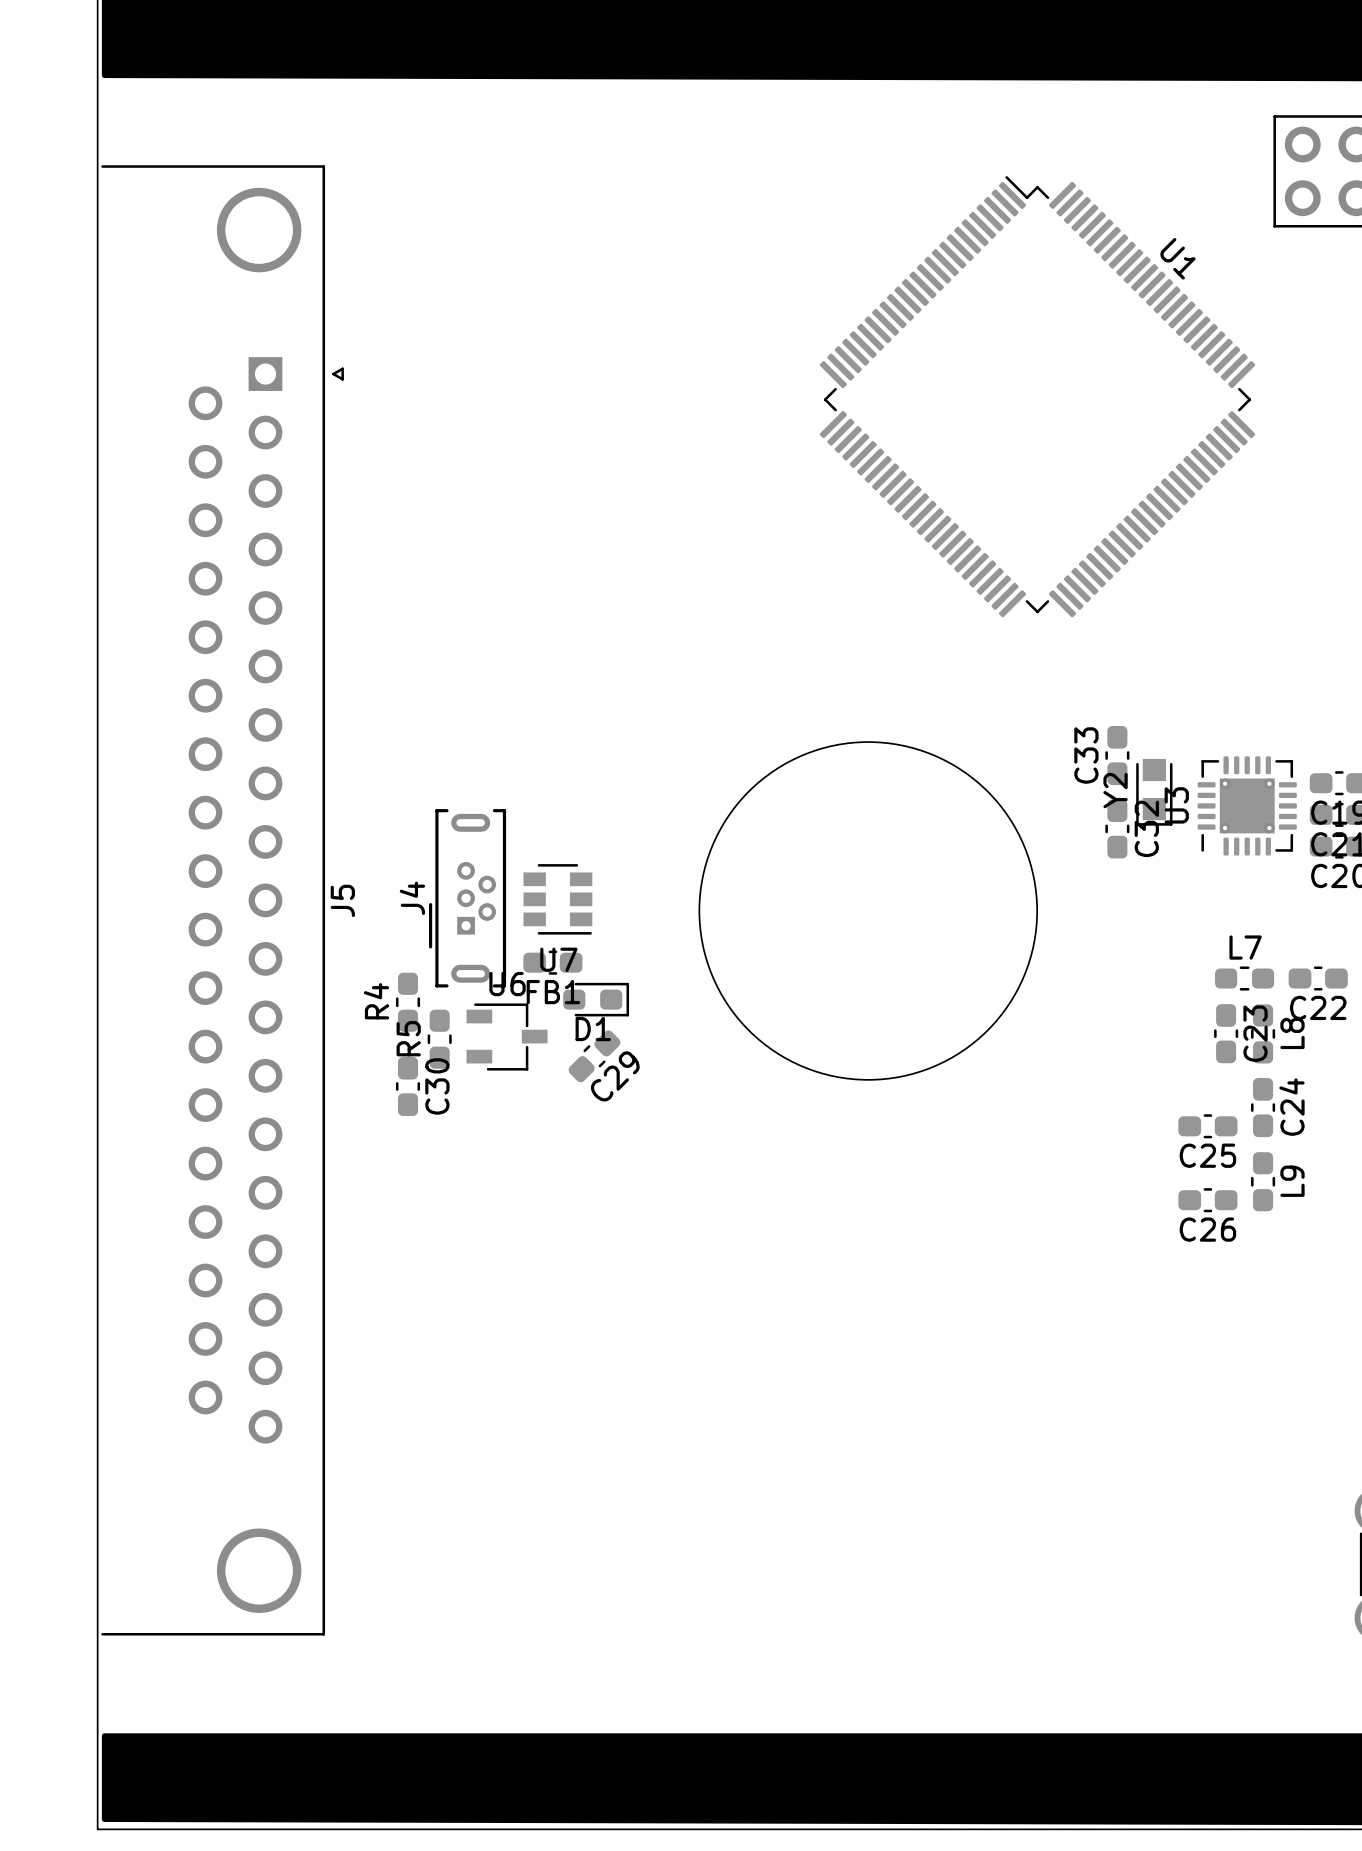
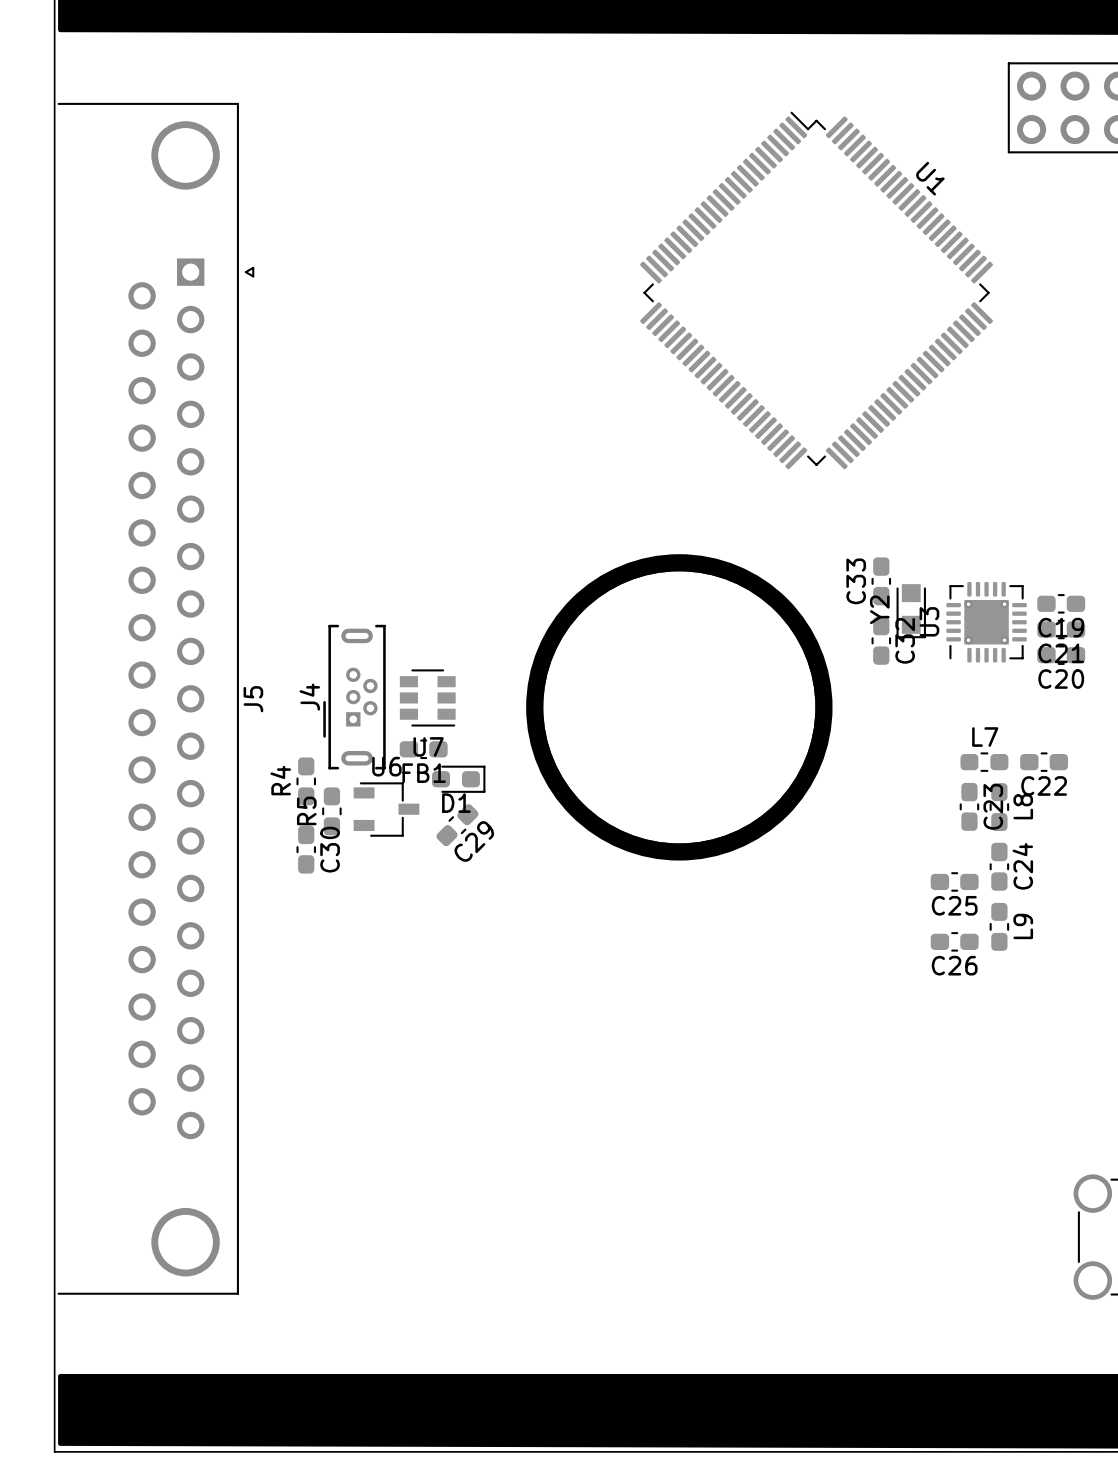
drawing: none -> [526, 554, 833, 861]

